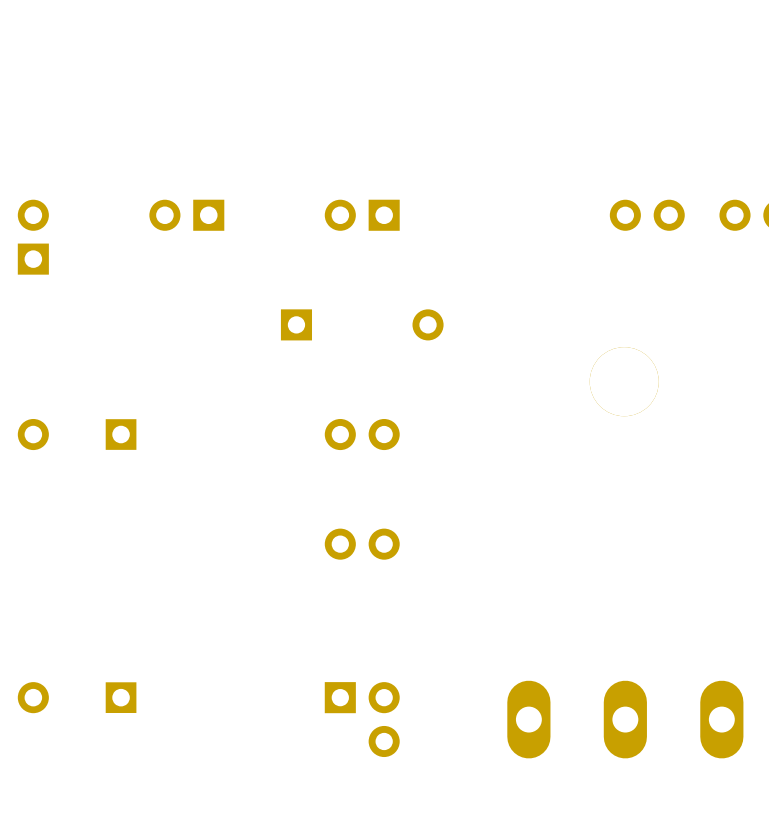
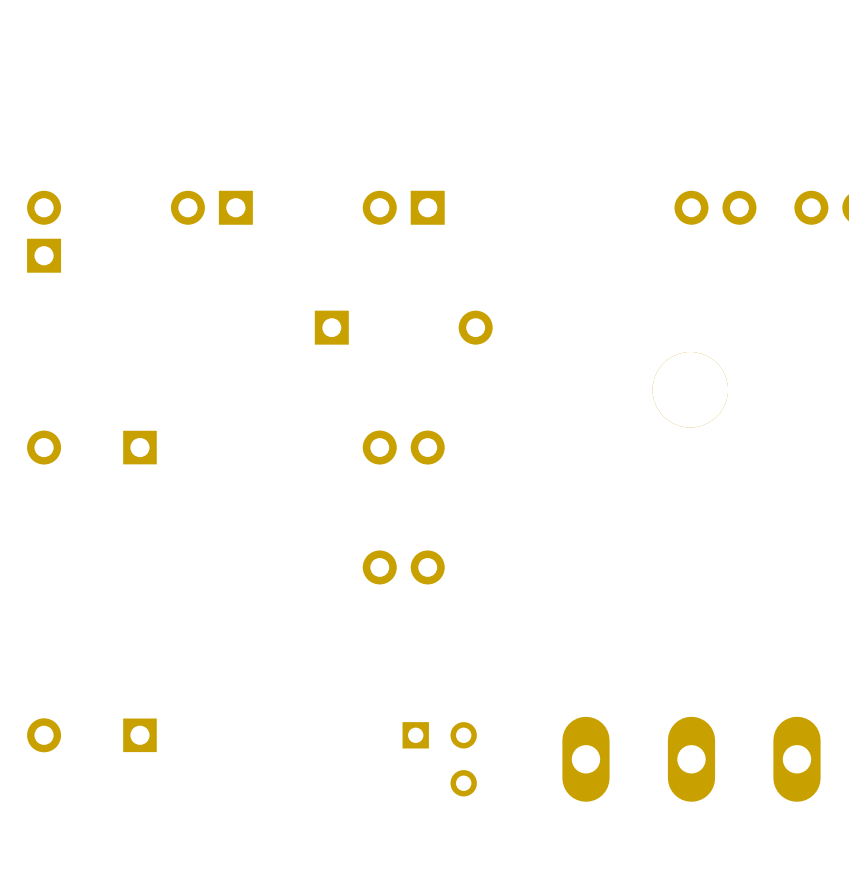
part: (362, 719) -> none
part: none -> (439, 759)

